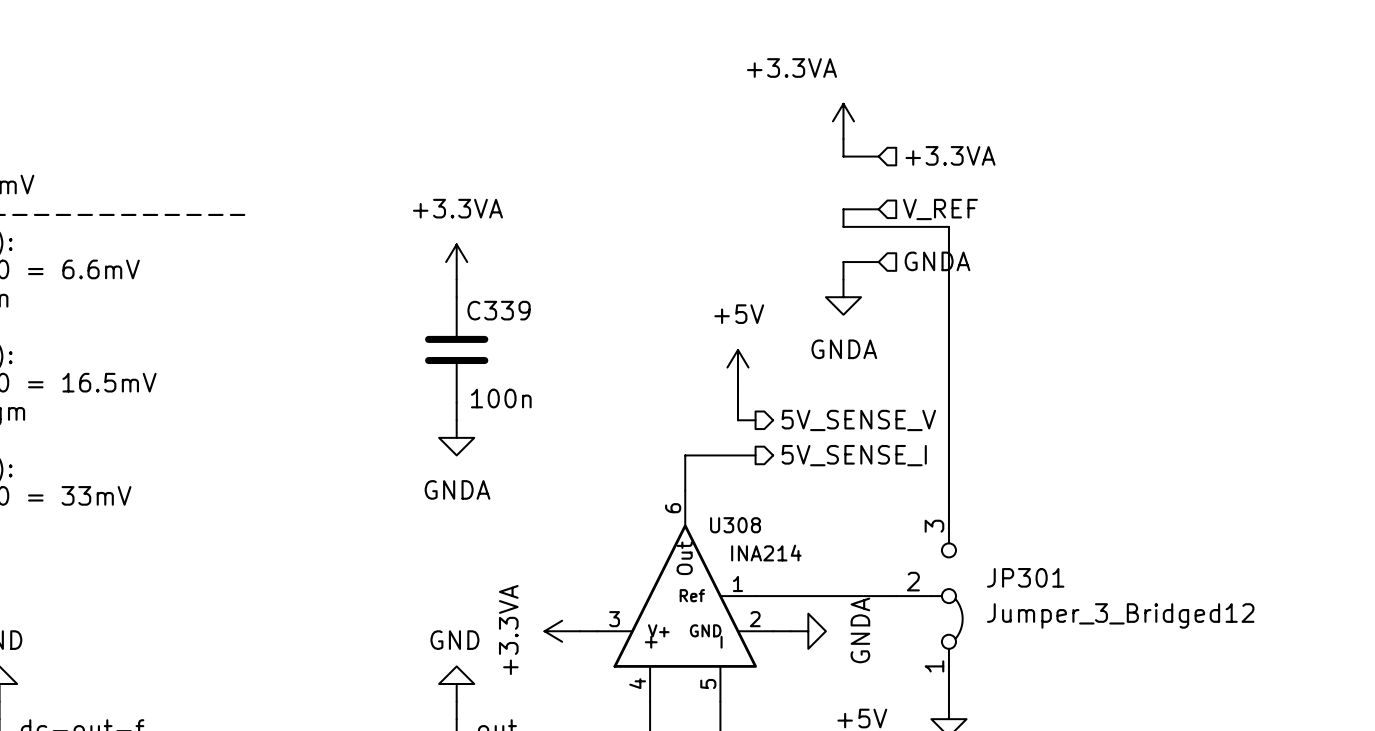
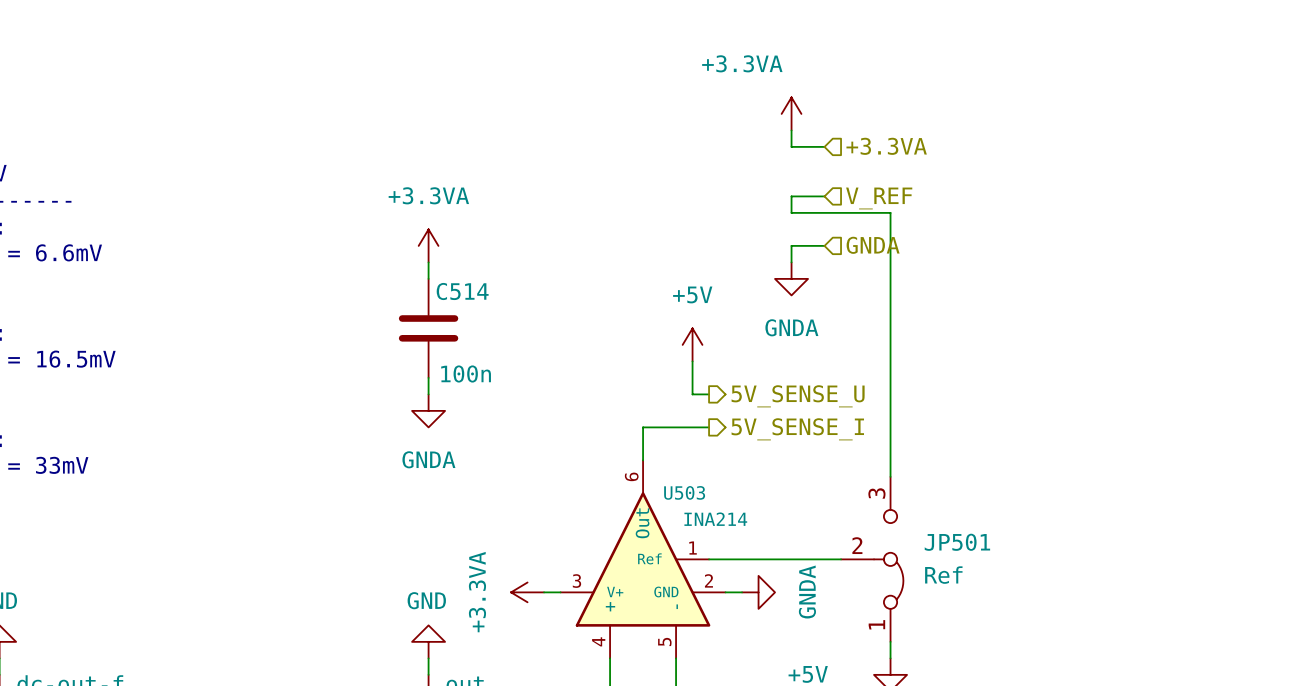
C339 name: C339 (499, 310) -> C514 (462, 291)
hierarchical label: 5V_SENSE_V (858, 420) -> 5V_SENSE_U (798, 396)
U308 name: U308 (735, 525) -> U503 (684, 492)
JP301 name: JP301 (1025, 577) -> JP501 (957, 542)
JP301 value: Jumper_3_Bridged12 (1120, 615) -> Ref (943, 575)

